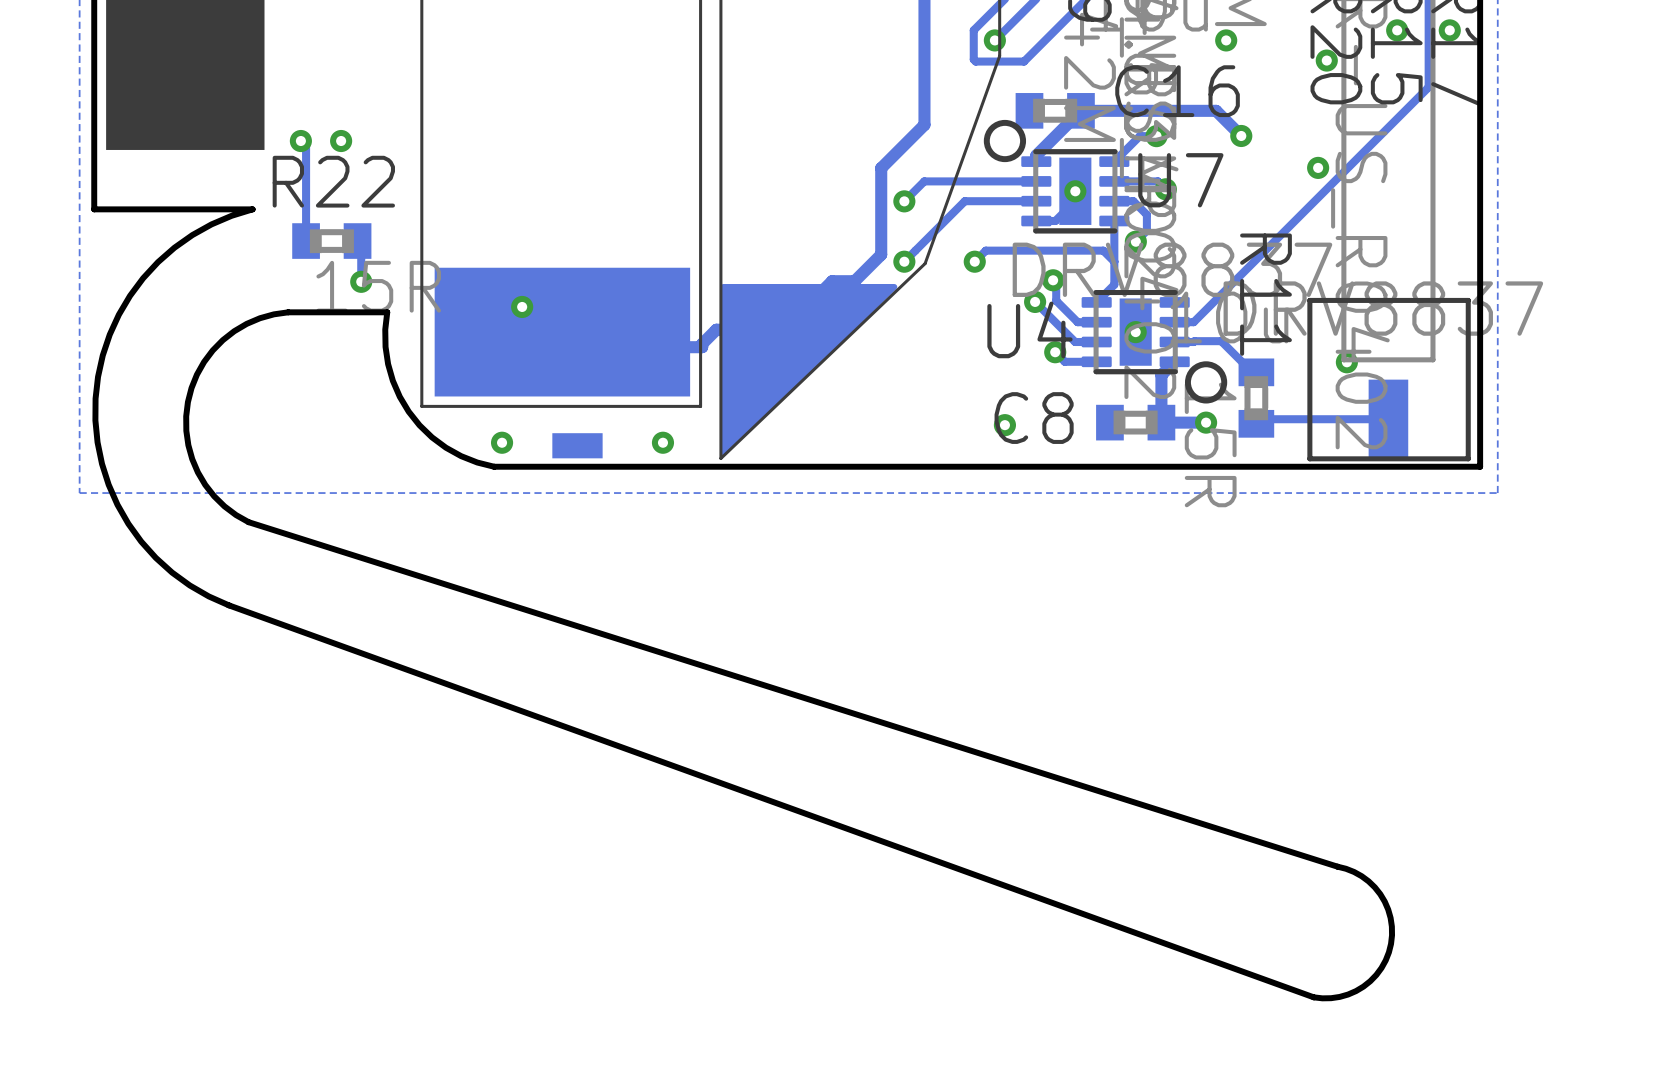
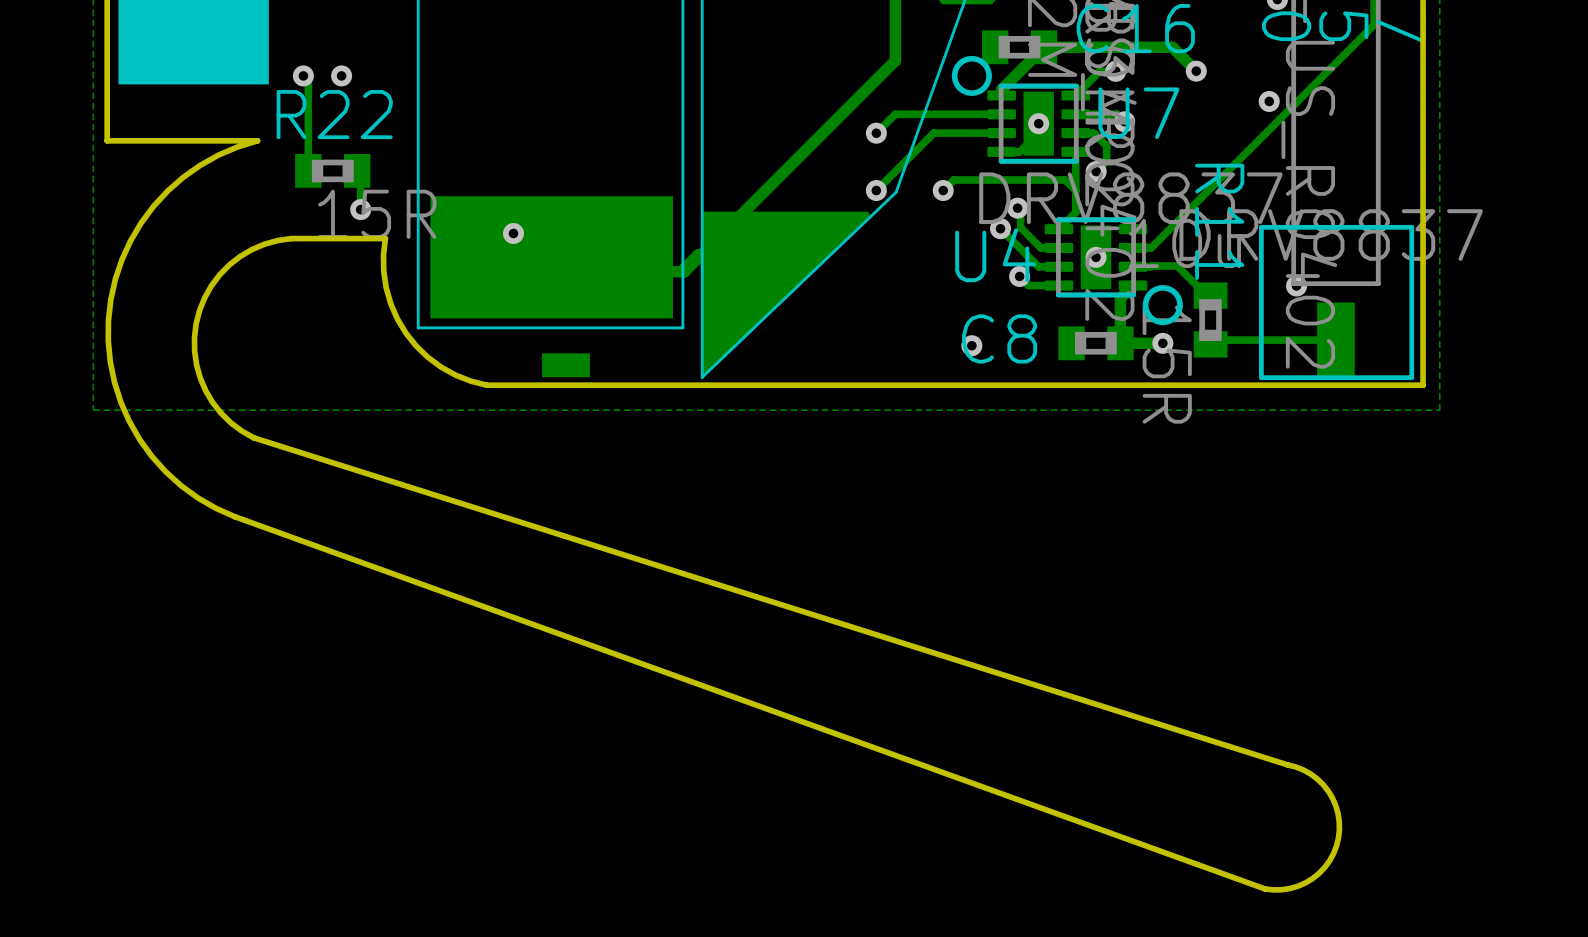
track: (881, 168) (881, 254) (854, 281) (832, 281) (783, 329) -> (854, 101) (684, 271)
via: (502, 442) -> none
via: (662, 442) -> none

